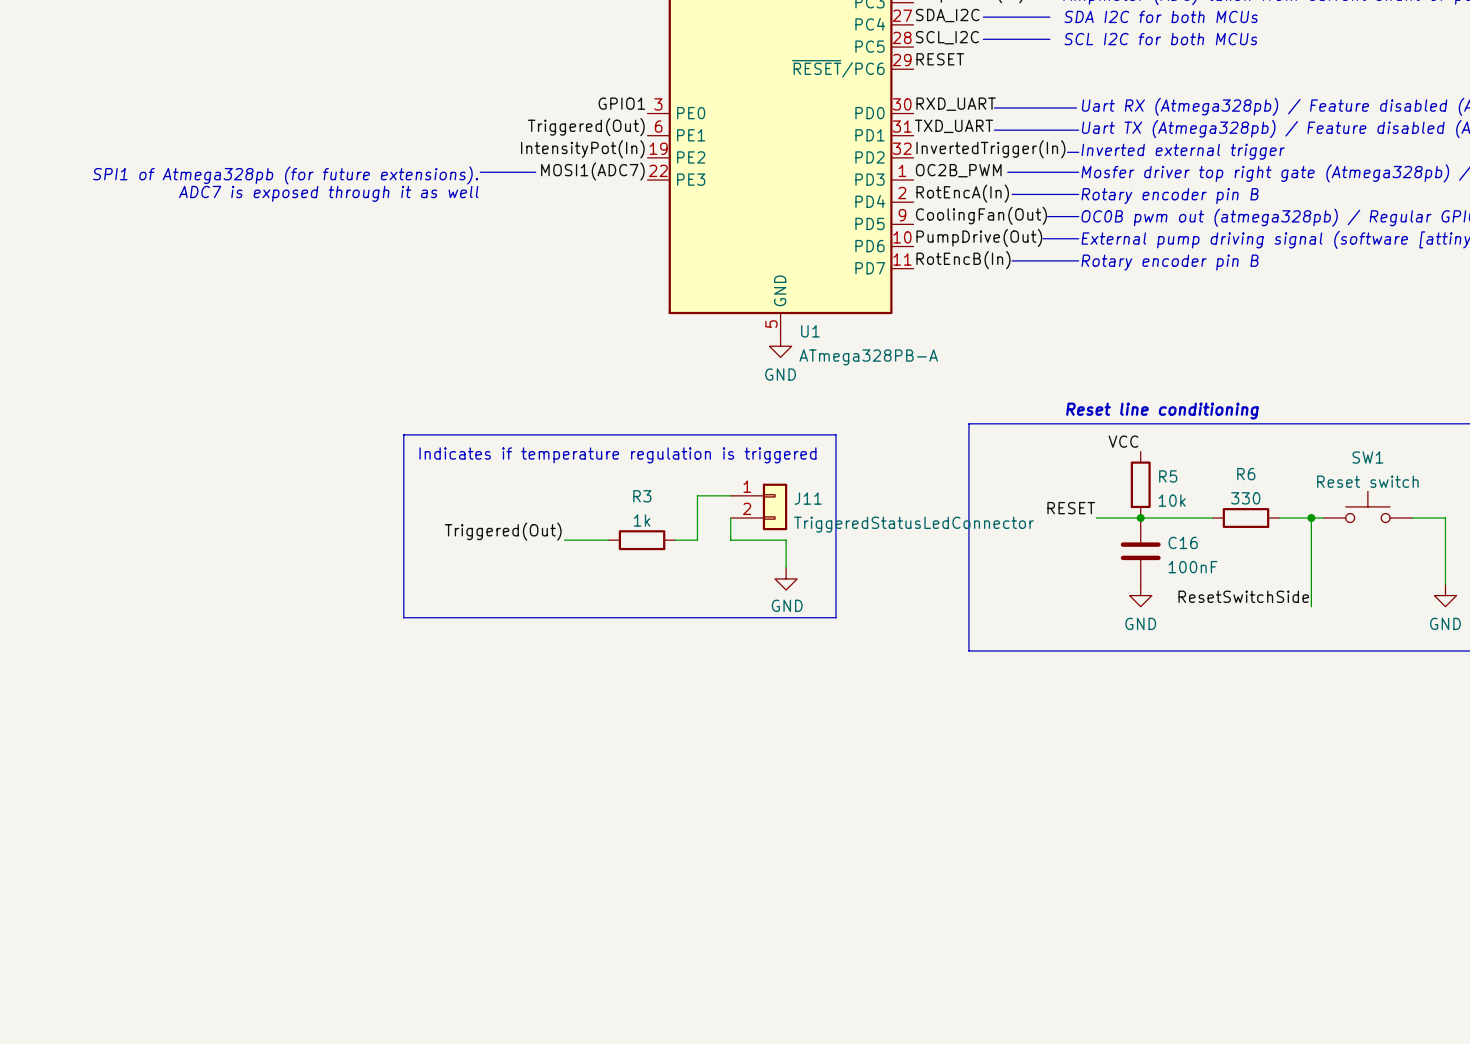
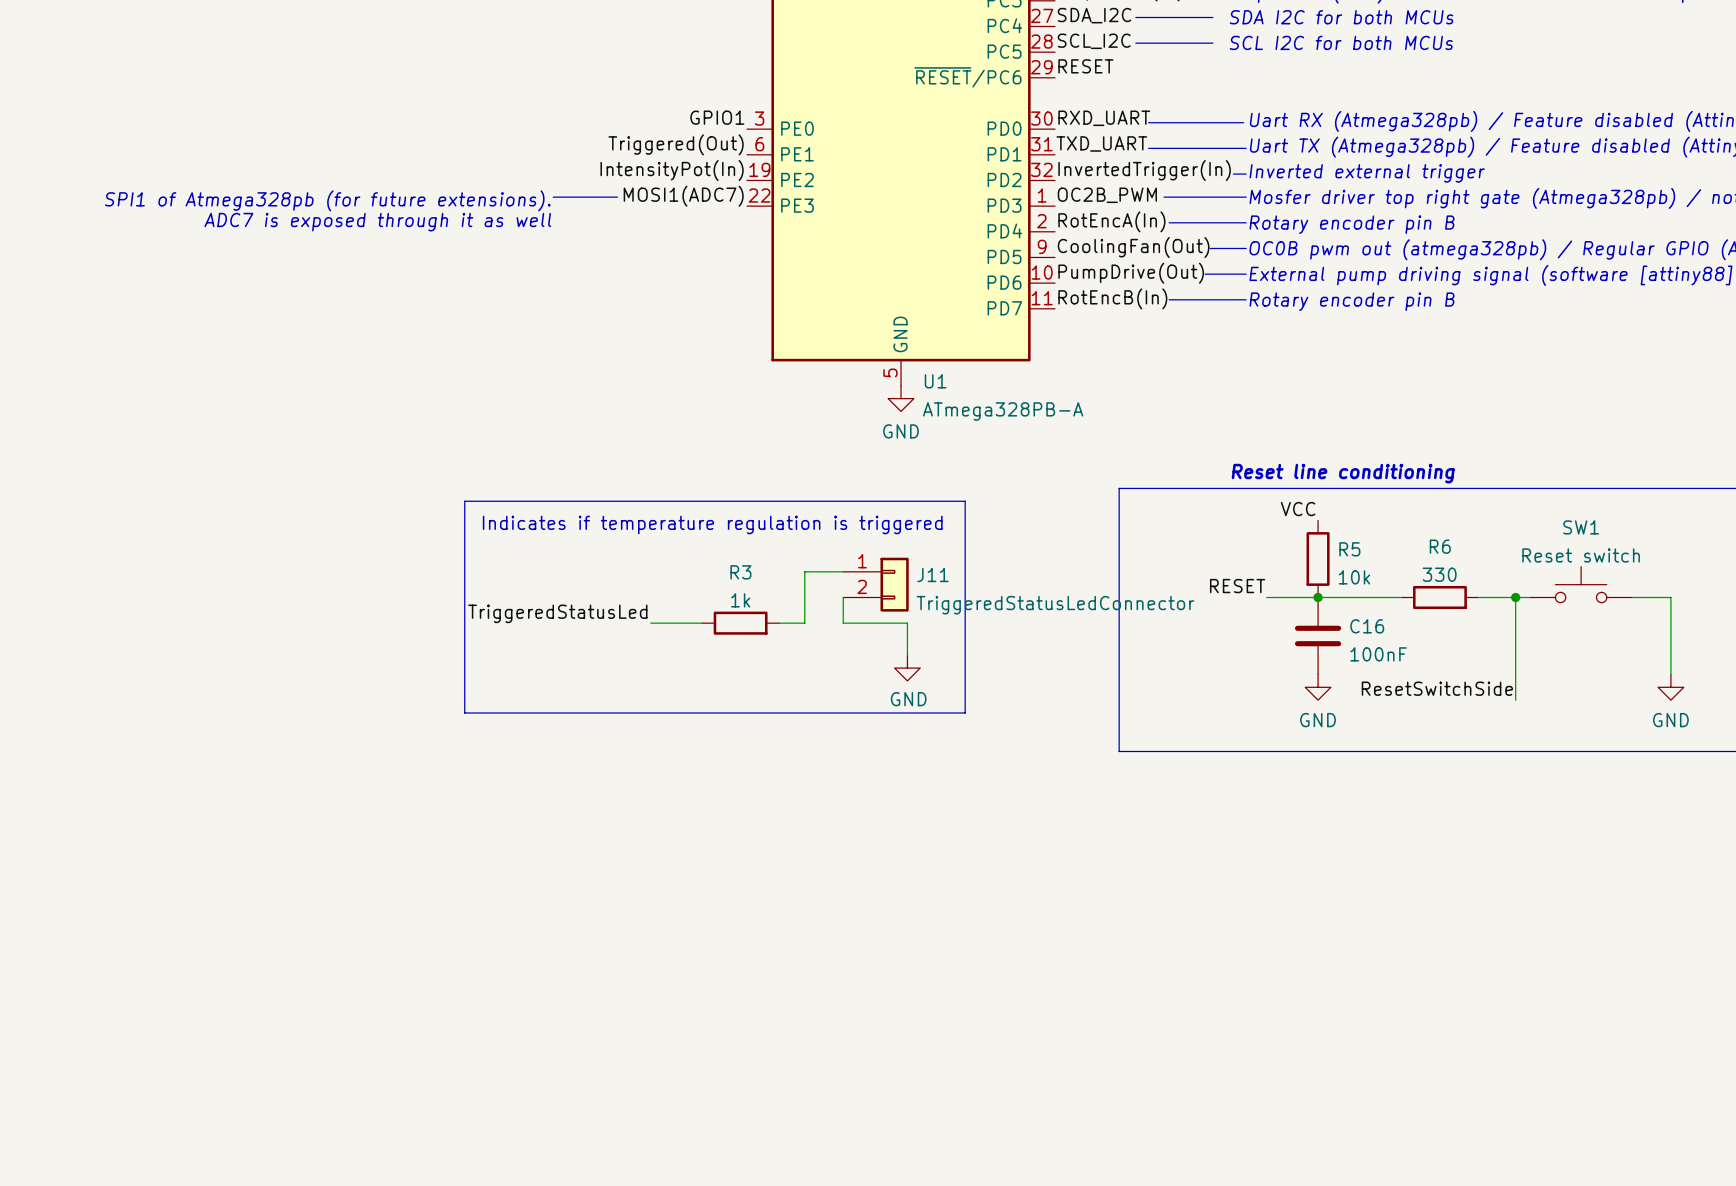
label: Triggered(Out) (503, 531) -> TriggeredStatusLed (557, 613)

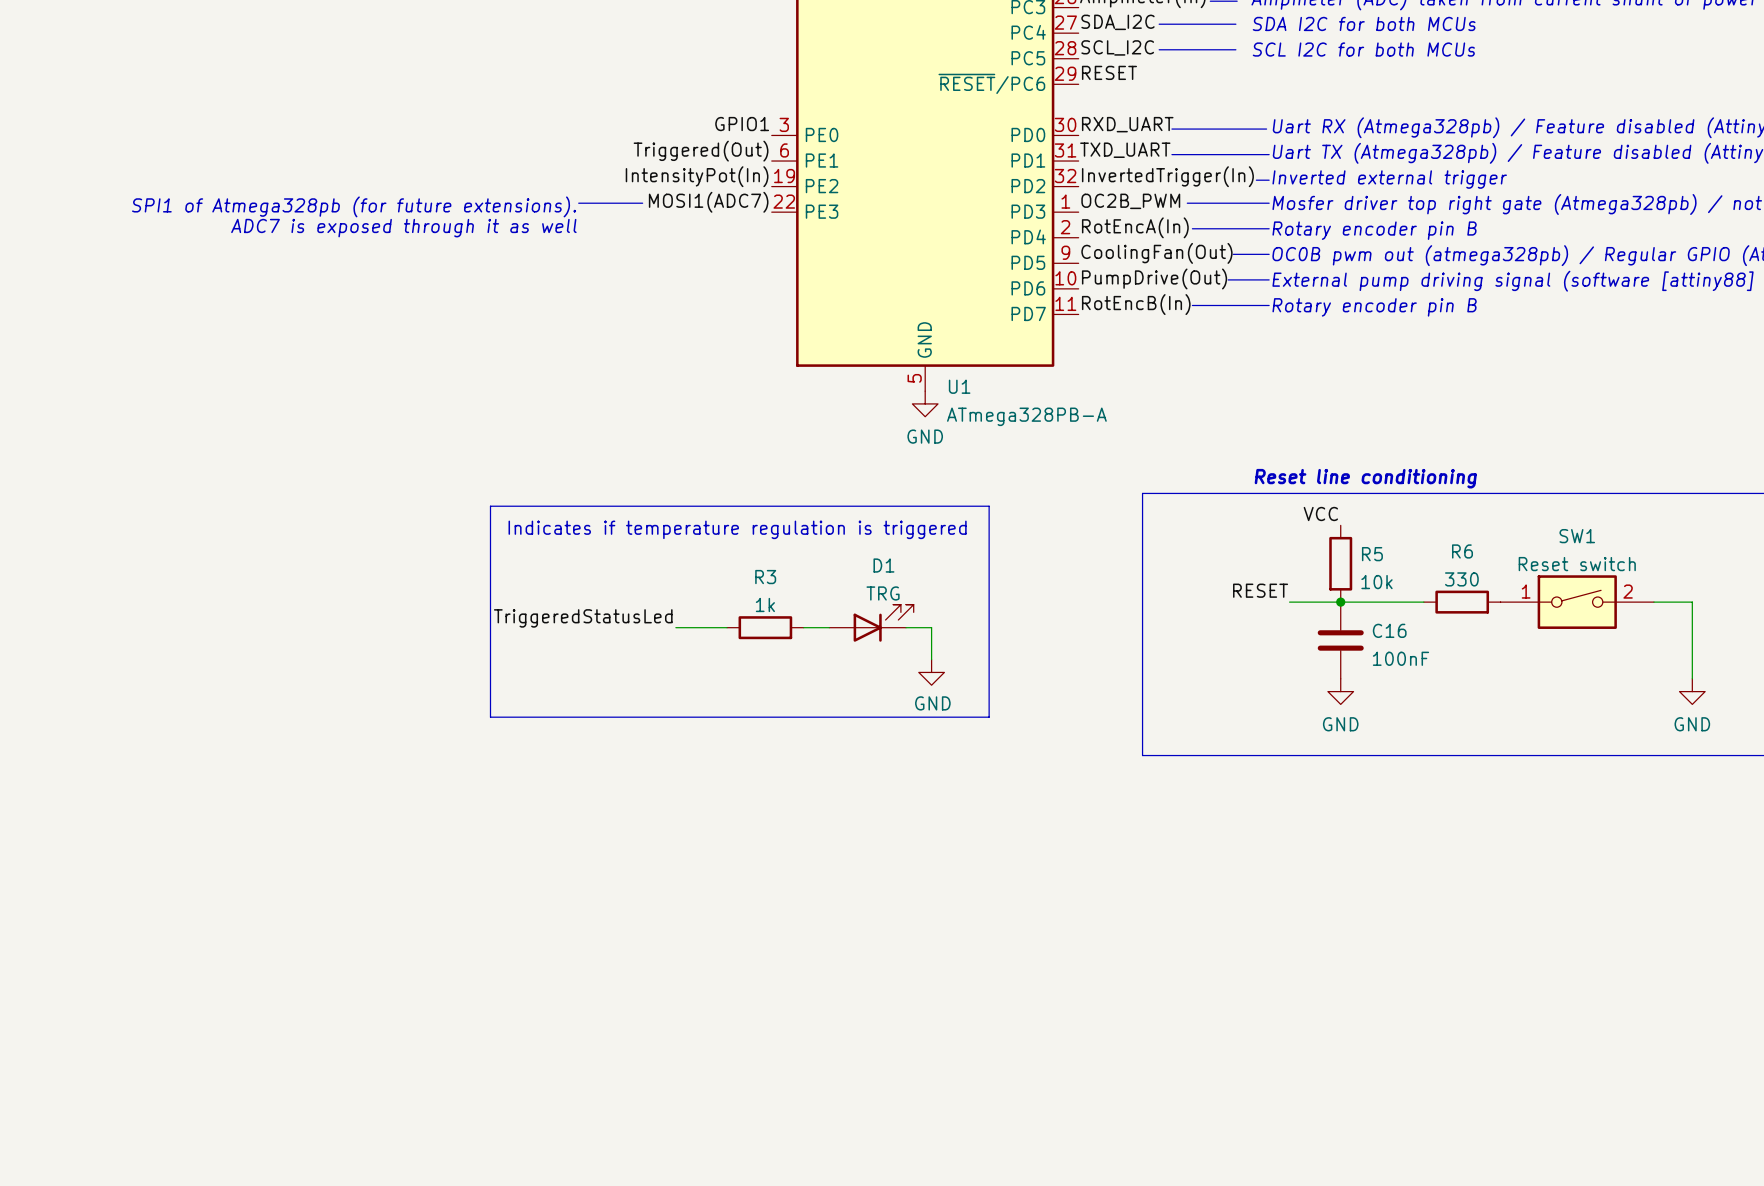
SW1 symbol: [1529, 566, 1633, 603] -> [1500, 575, 1654, 629]
wire: (843, 571) (804, 571) (804, 623) -> none
J11: TriggeredStatusLedConnector (875, 584) -> none
wire: (843, 597) (843, 623) (881, 623) -> none
wire: (1515, 597) (1515, 700) -> none
junction: (1515, 597) -> none
D1: none -> TRG (871, 623)
label: ResetSwitchSide (1437, 688) -> none

